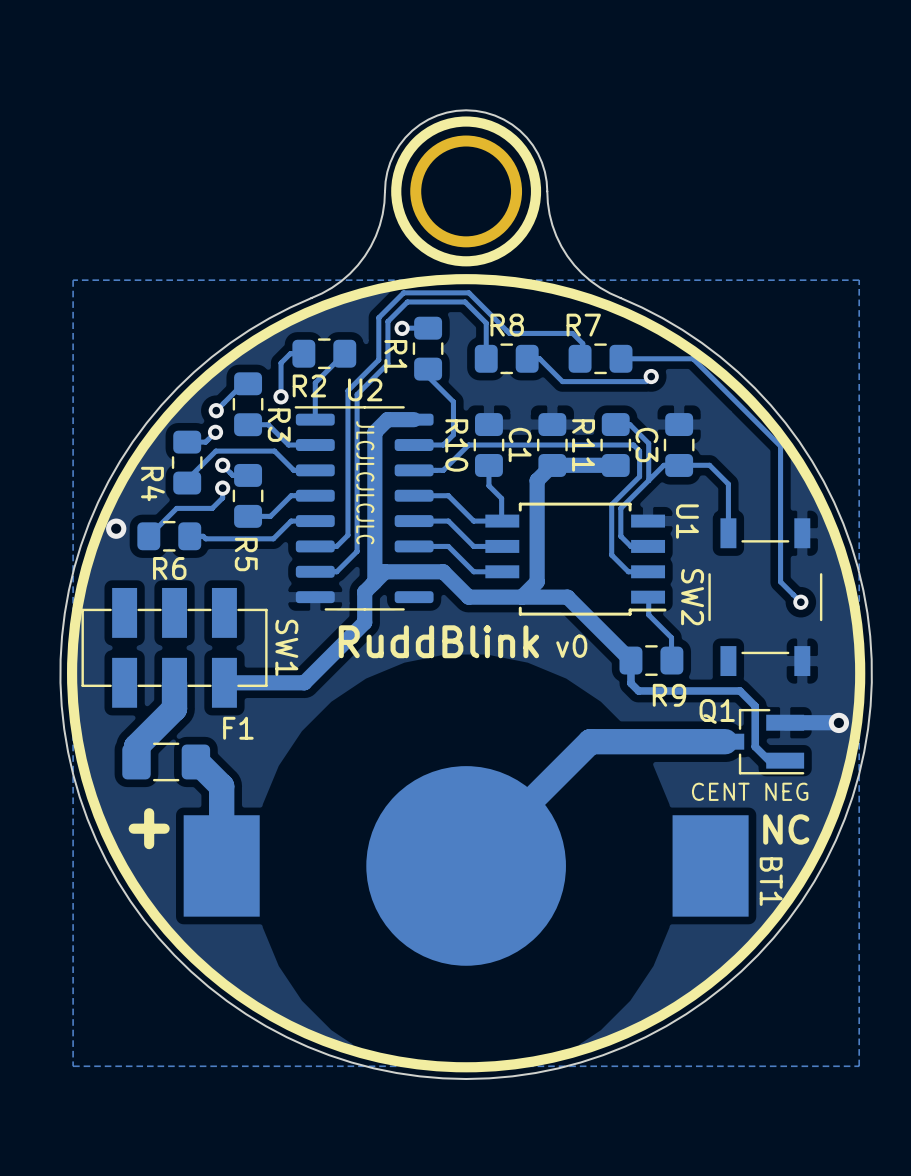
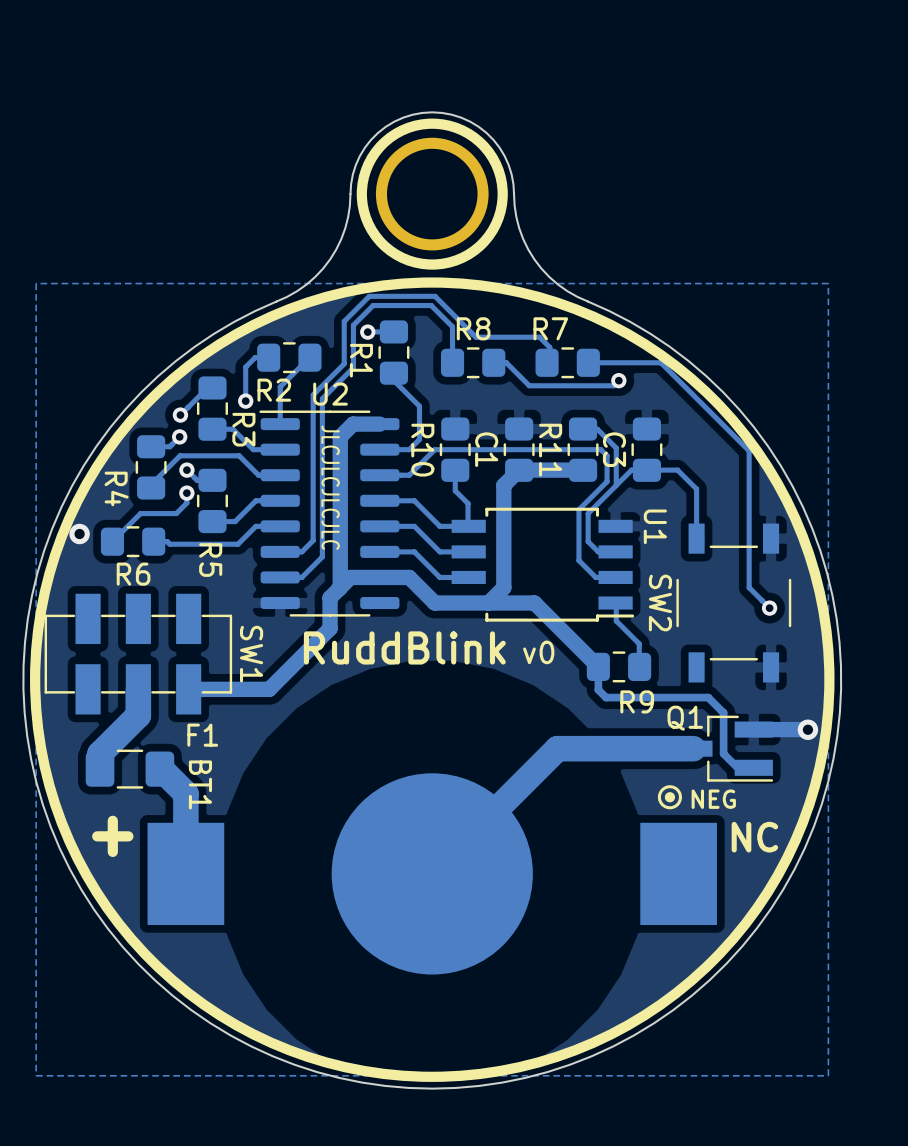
drawing: none -> [657, 785, 682, 810]
text: CENT NEG (750, 791) -> NEG (713, 799)
BT1 name position: BT1 (771, 881) -> BT1 (200, 784)

